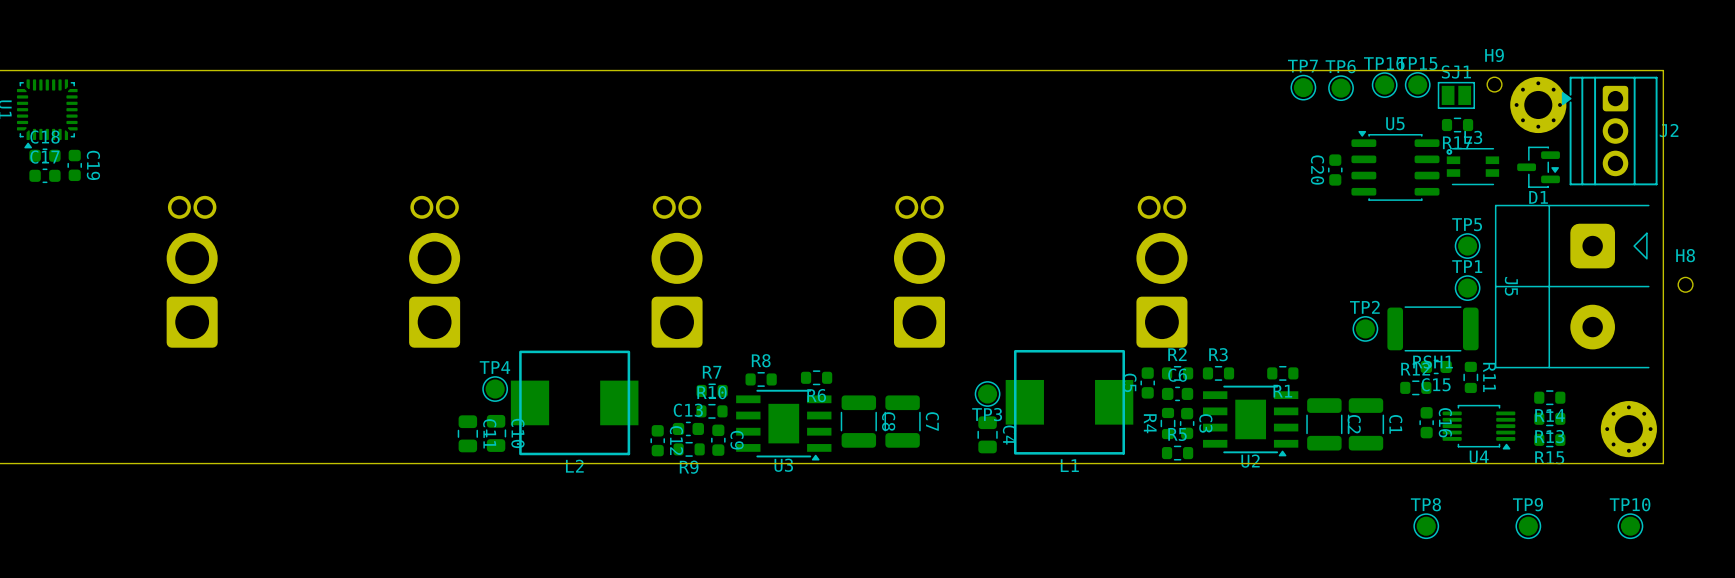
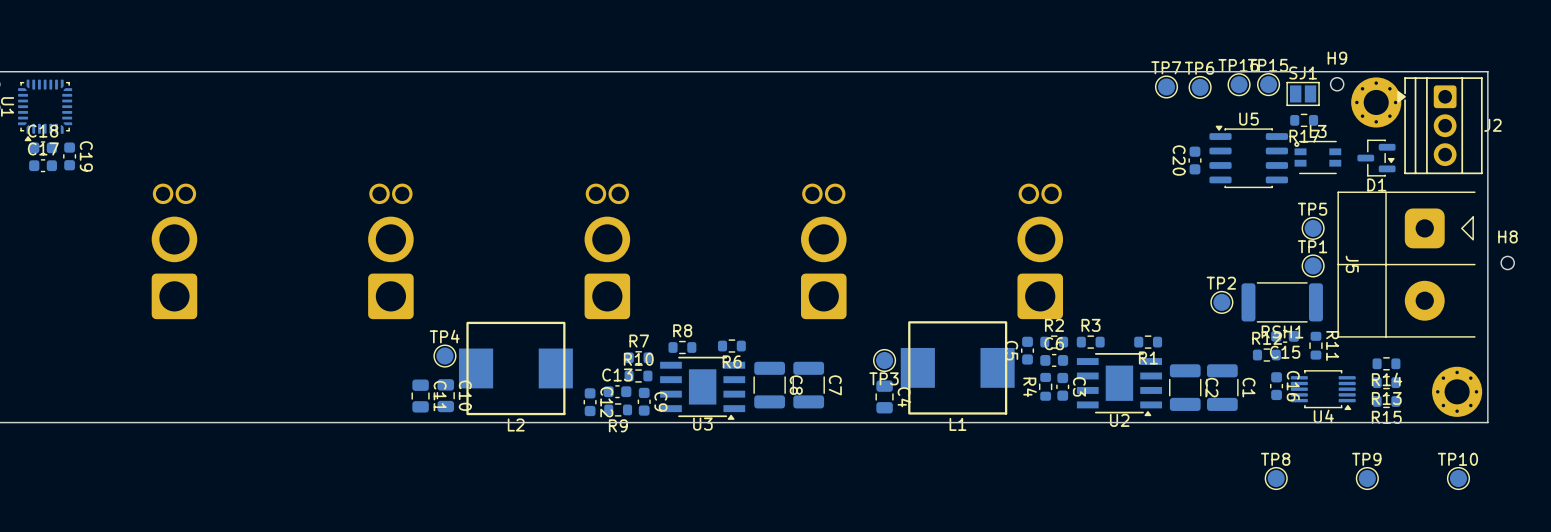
R5: (1177, 453) -> none

